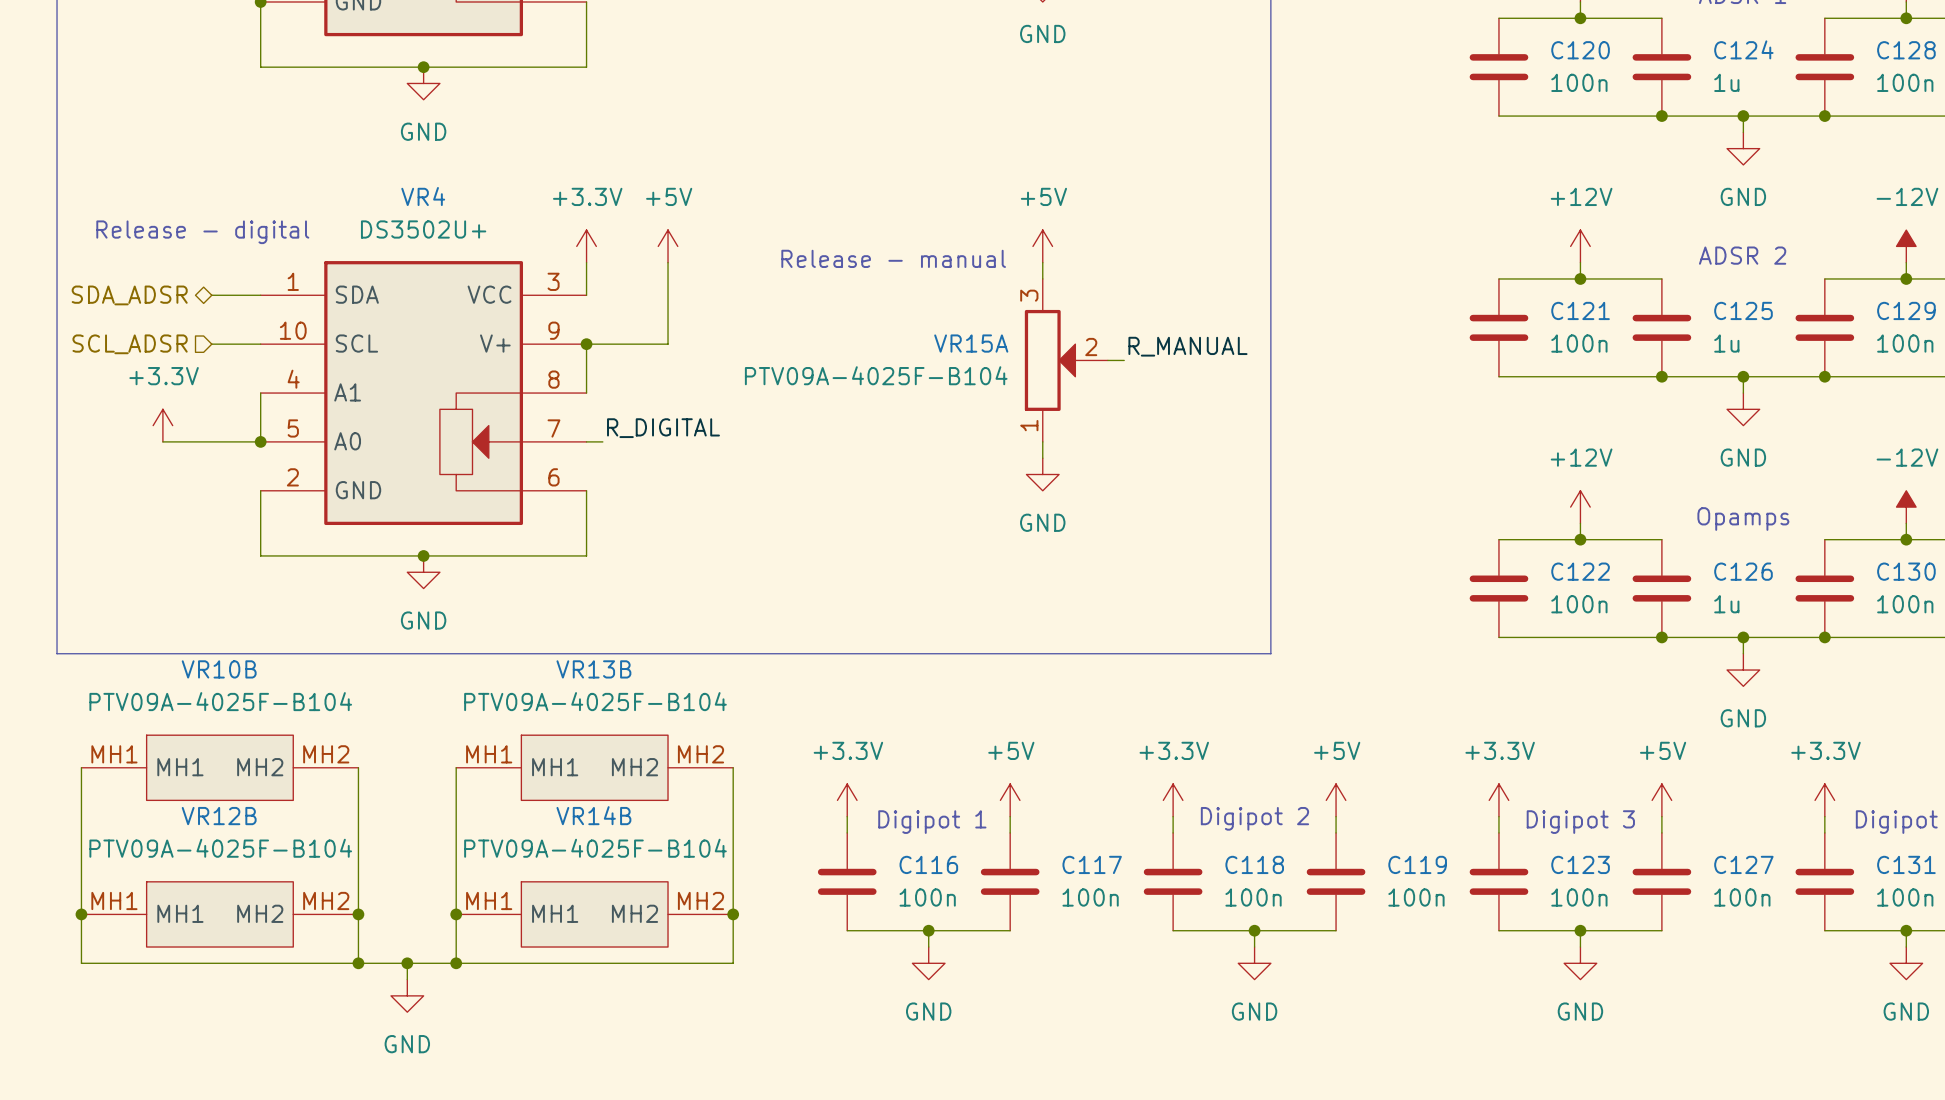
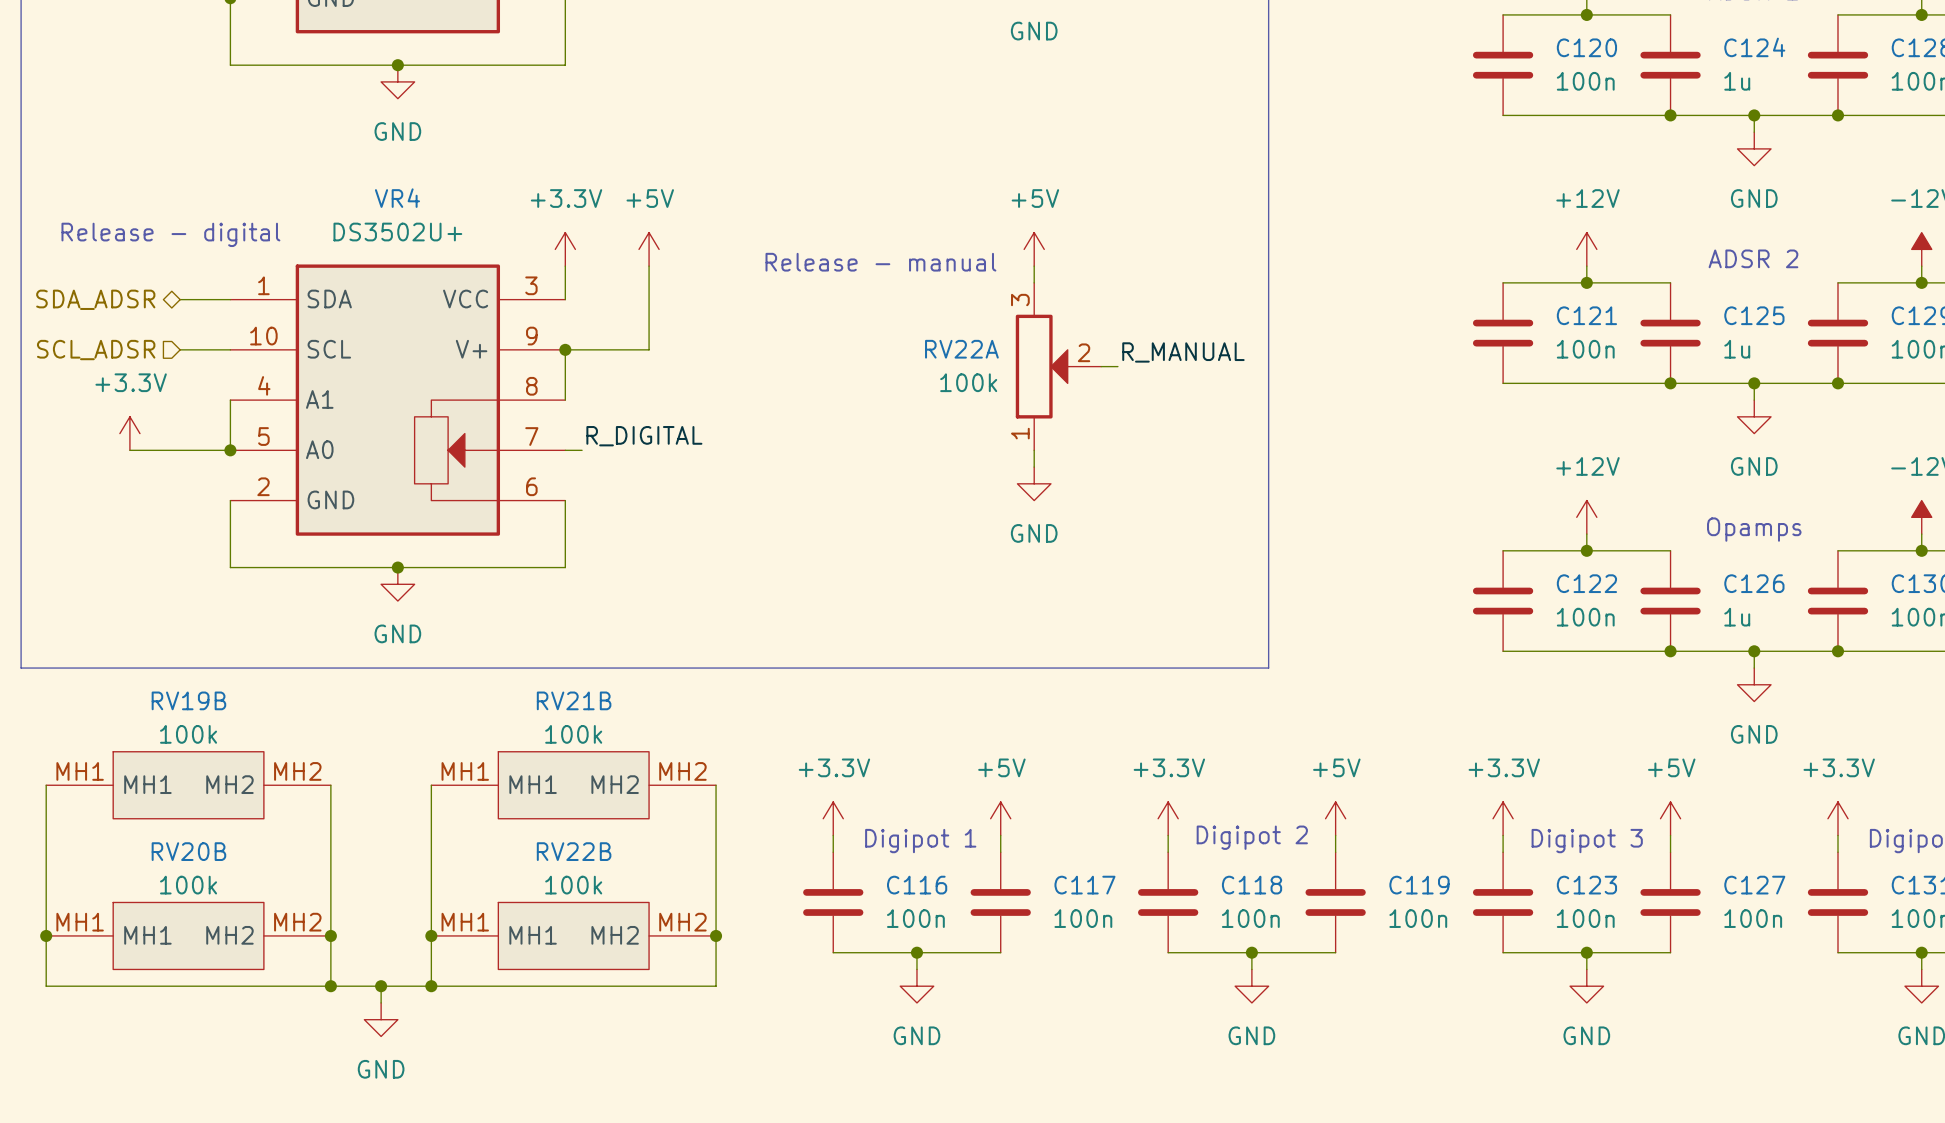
VR15A name: VR15A (971, 343) -> RV22A (961, 349)
VR15A value: PTV09A-4025F-B104 (876, 375) -> 100k (968, 382)
VR10B name: VR10B (219, 669) -> RV19B (188, 700)
VR13B name: VR13B (593, 669) -> RV21B (574, 700)
VR10B value: PTV09A-4025F-B104 (220, 701) -> 100k (188, 734)
VR13B value: PTV09A-4025F-B104 (595, 701) -> 100k (573, 734)
VR14B name: VR14B (593, 815) -> RV22B (574, 851)
VR12B name: VR12B (219, 816) -> RV20B (188, 851)
VR12B value: PTV09A-4025F-B104 (220, 848) -> 100k (188, 885)
VR14B value: PTV09A-4025F-B104 (595, 848) -> 100k (573, 885)

